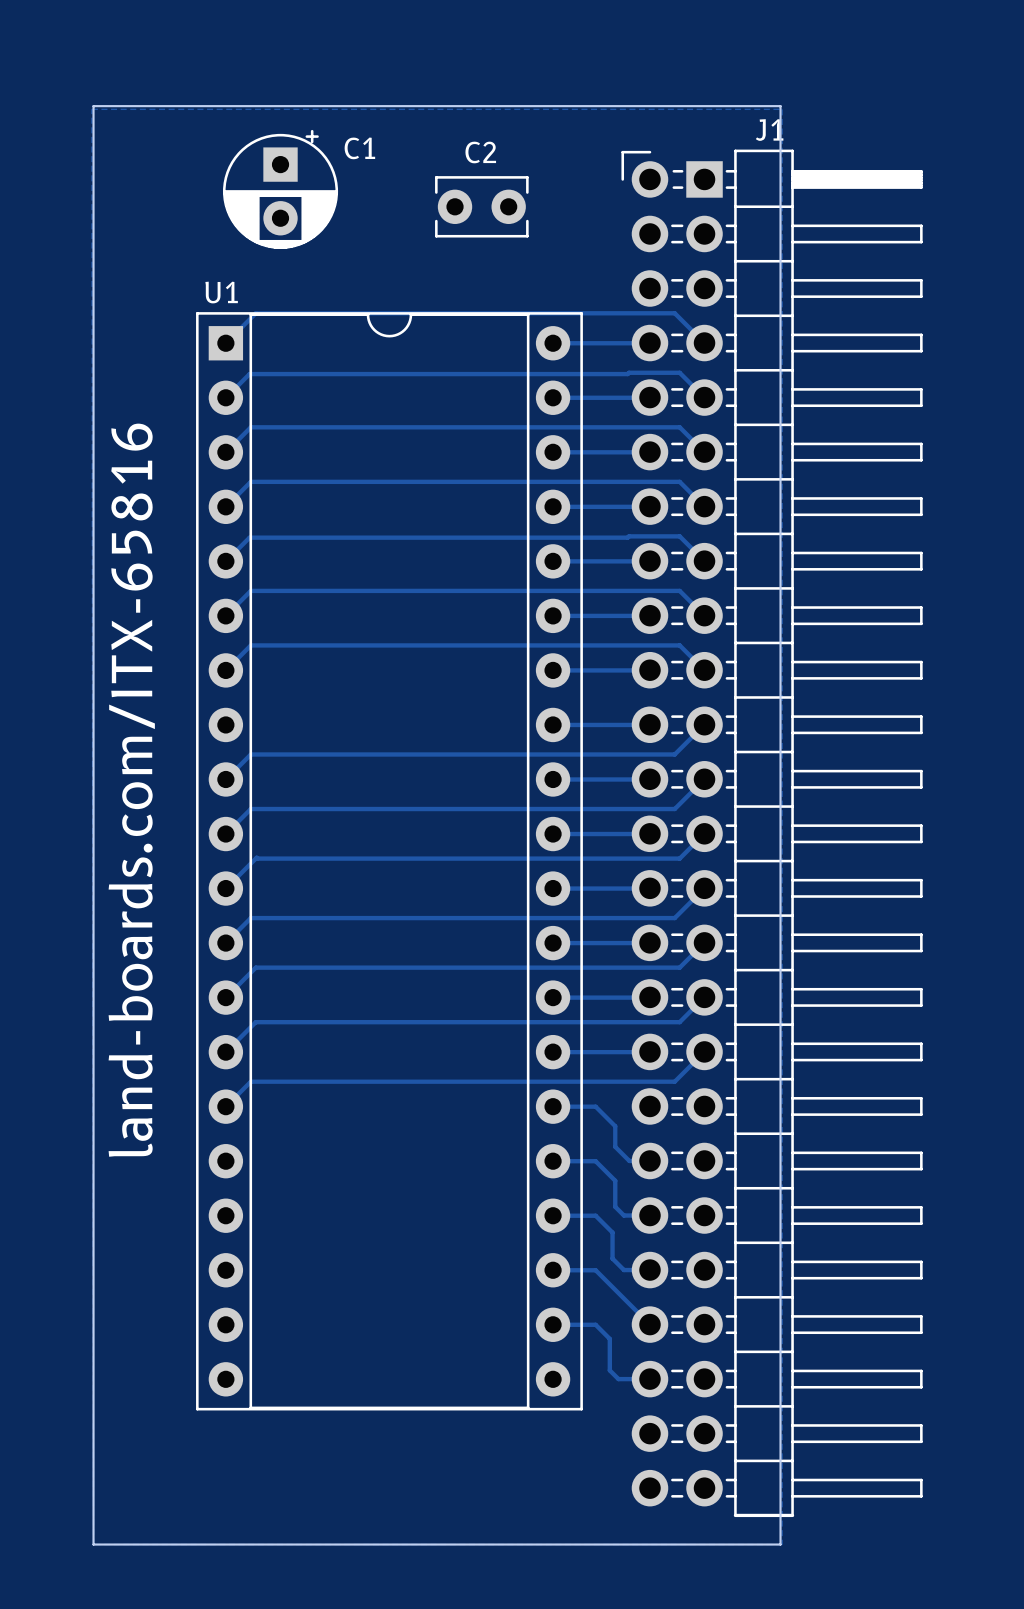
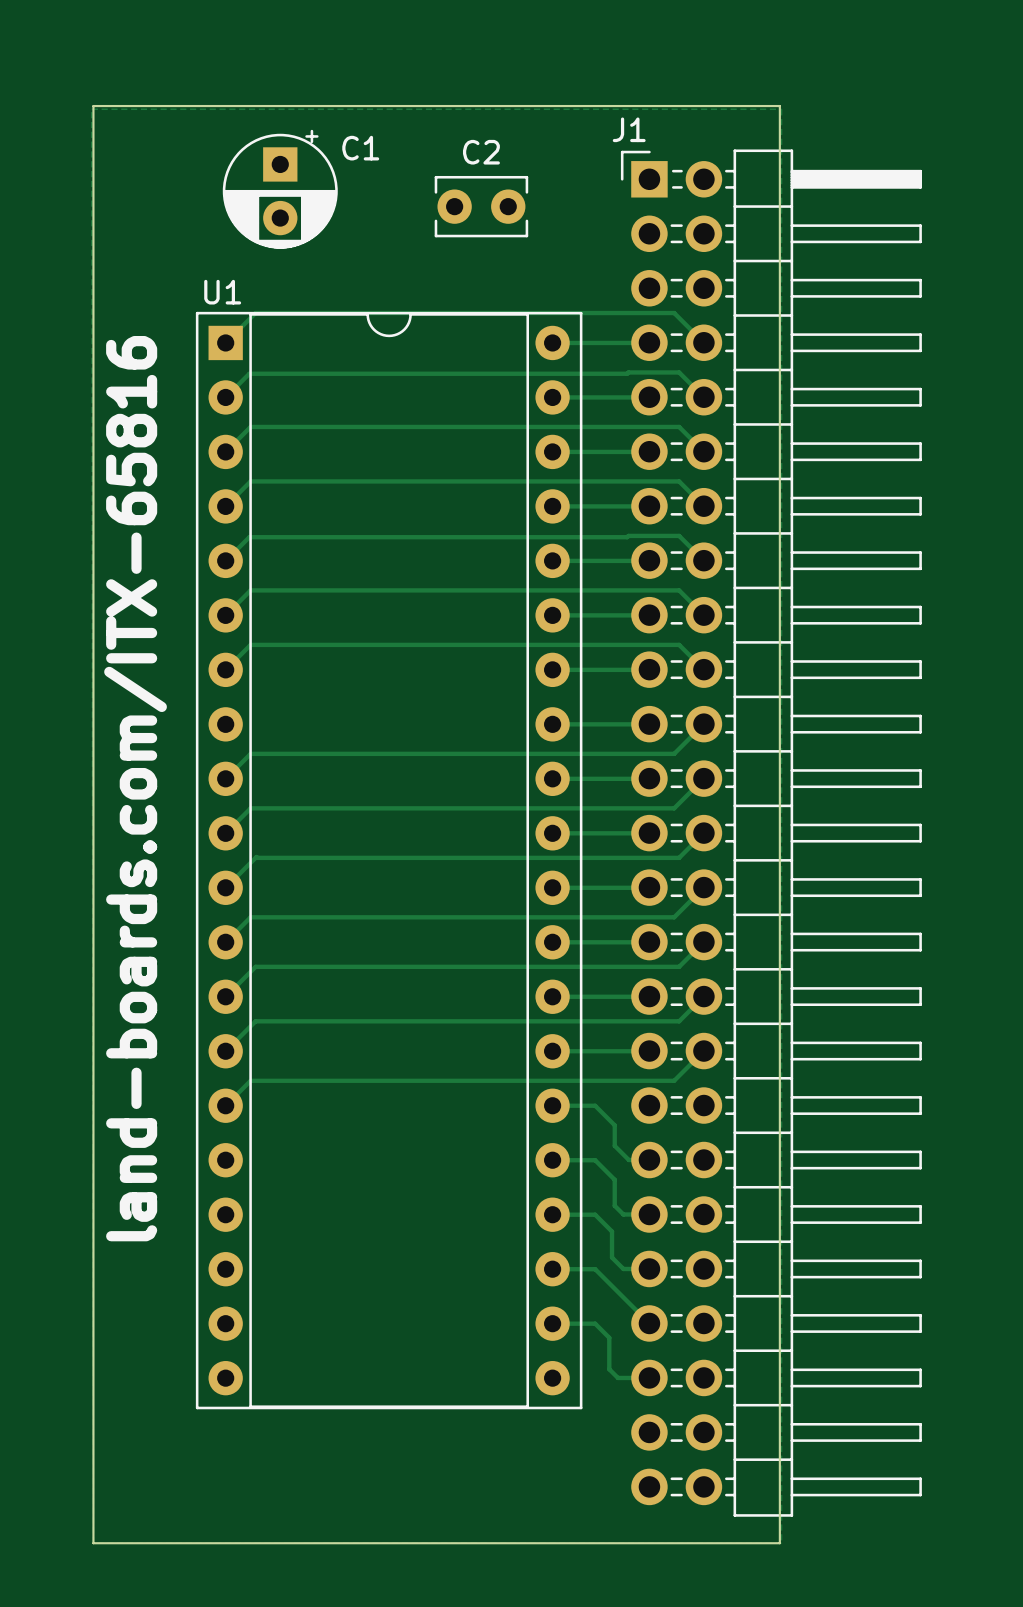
J1 name position: J1 (769, 130) -> J1 (629, 129)
J1 footprint: [621, 149, 923, 1518] -> [620, 149, 922, 1517]

